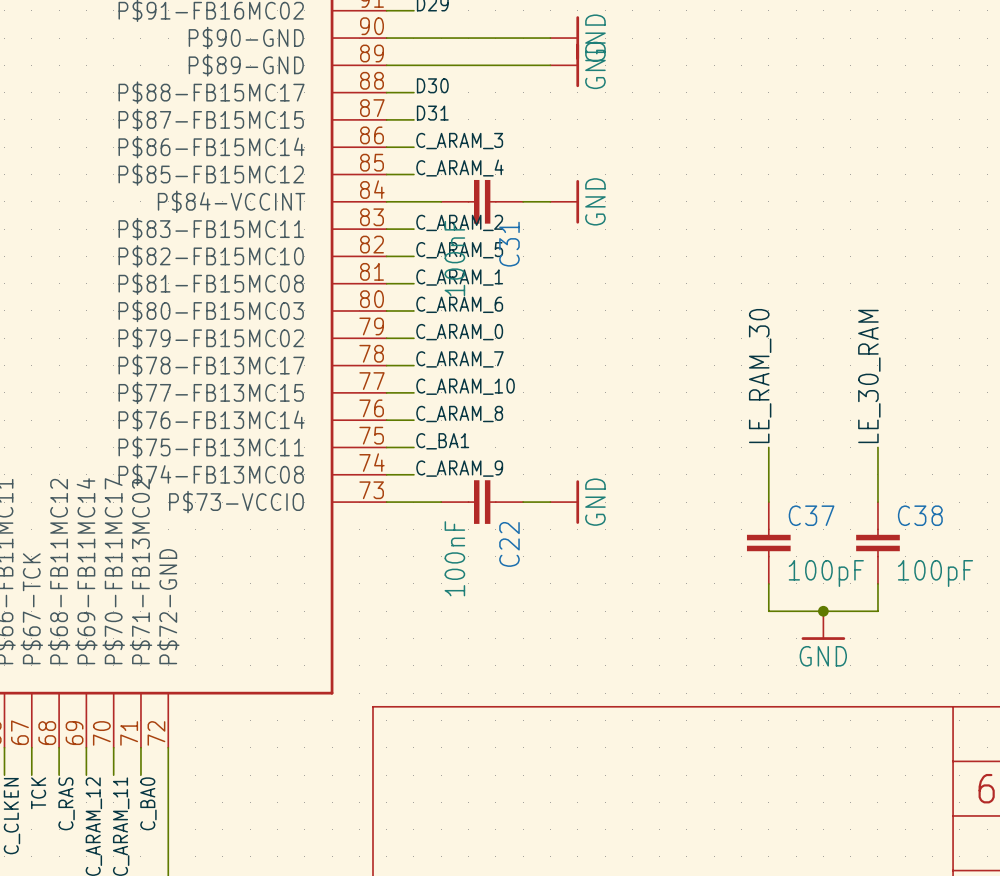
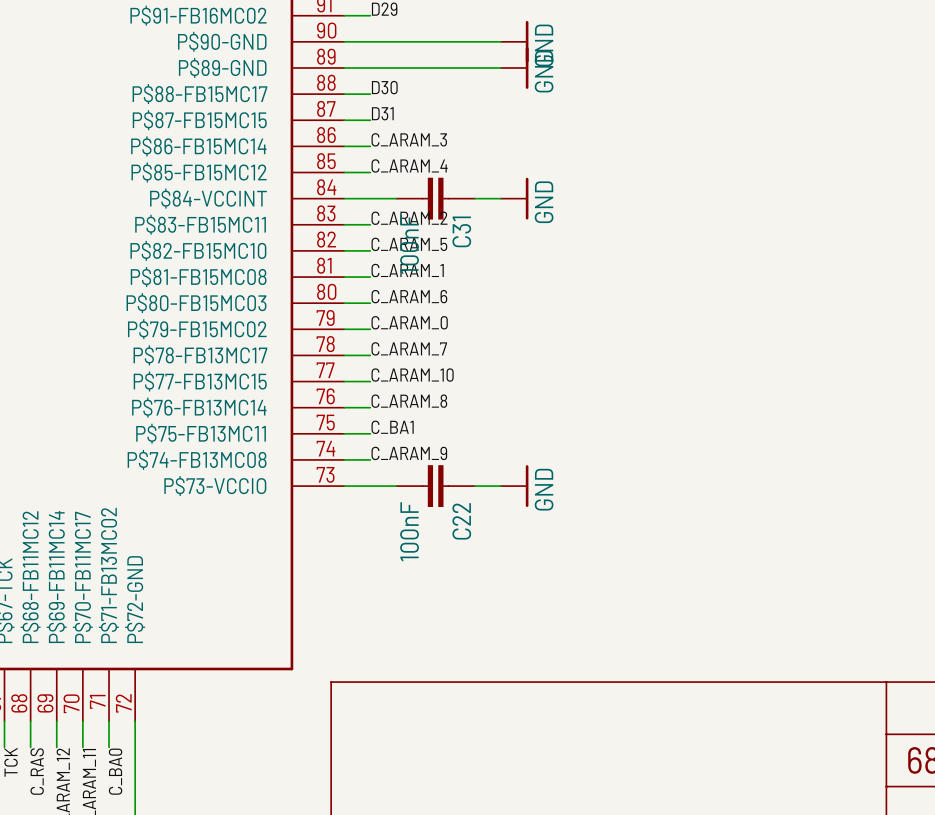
label: LE_RAM_30 (760, 376) -> none
label: LE_30_RAM (869, 376) -> none
wire: (768, 447) (768, 502) -> none
wire: (877, 447) (877, 502) -> none
C37: 100pF (768, 543) -> none
C38: 100pF (877, 543) -> none
wire: (768, 583) (768, 611) (877, 611) (877, 583) -> none
junction: (823, 611) -> none
power symbol: GND (823, 625) -> none

